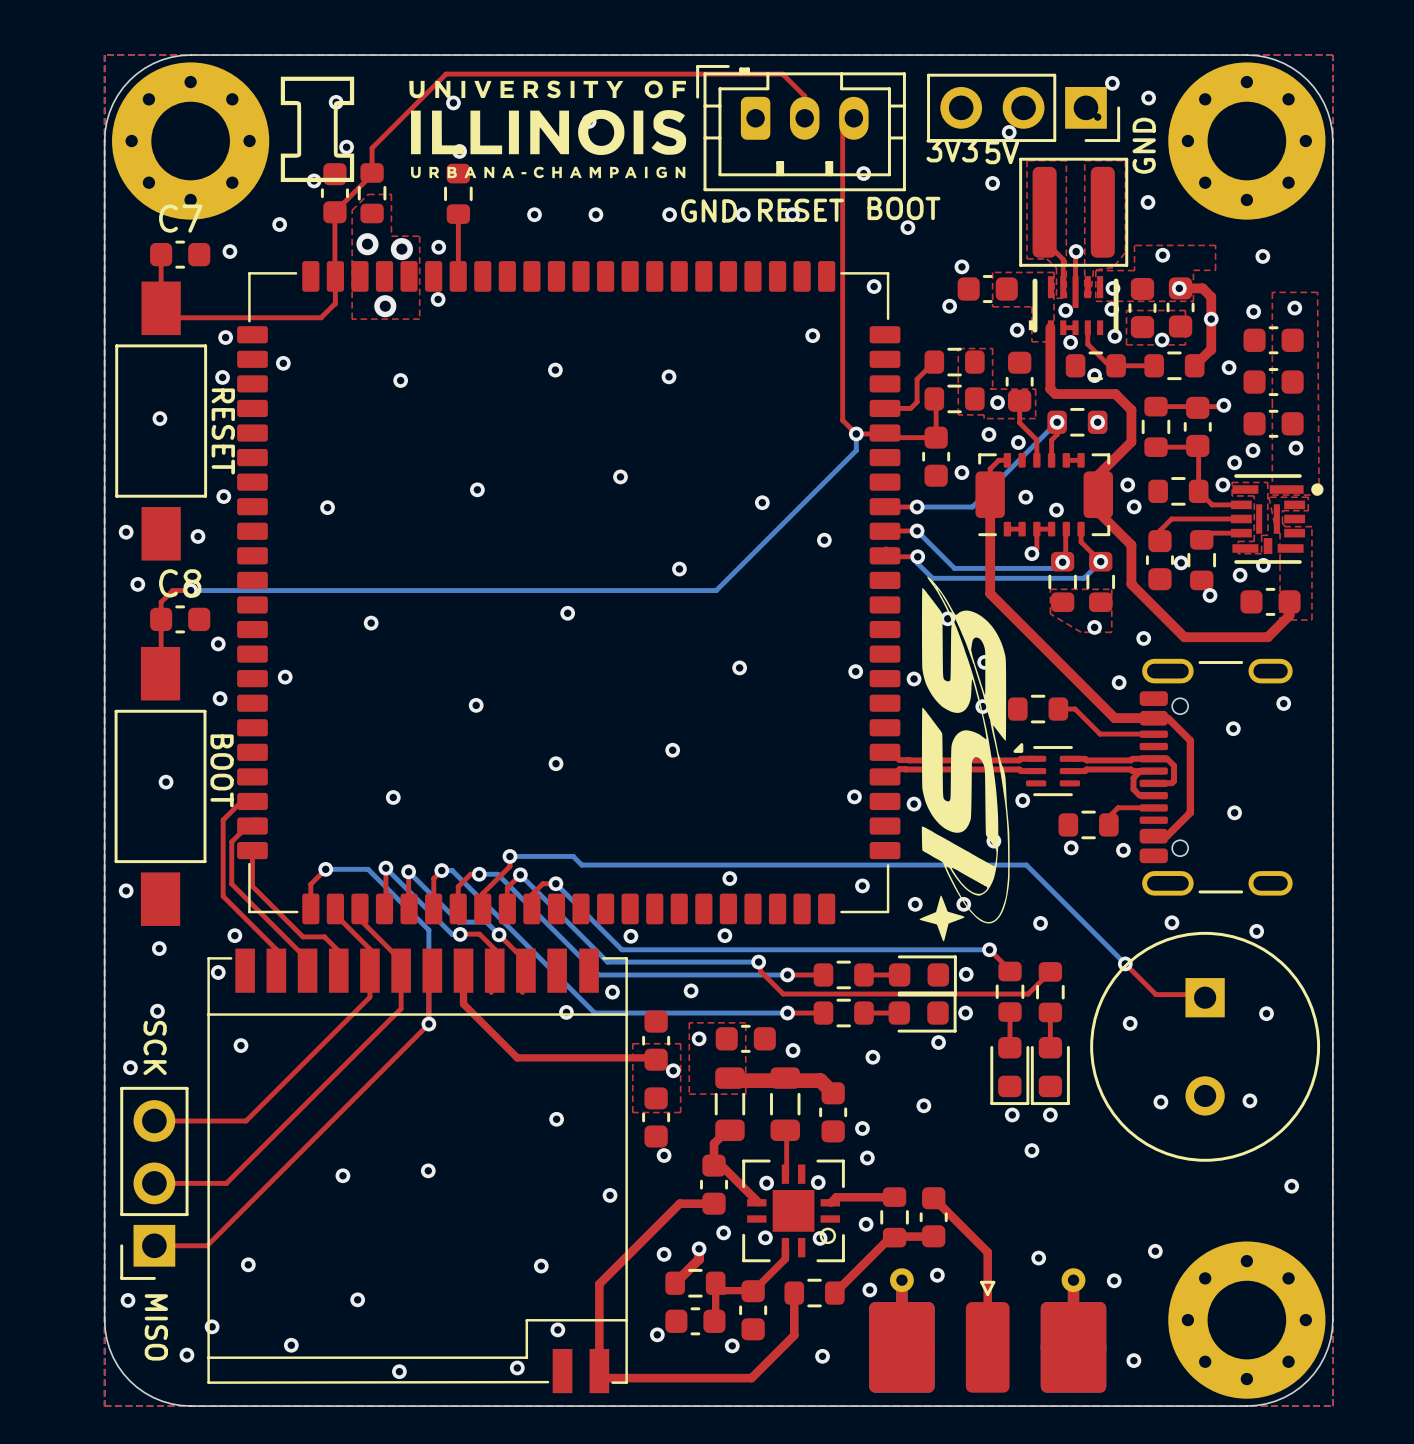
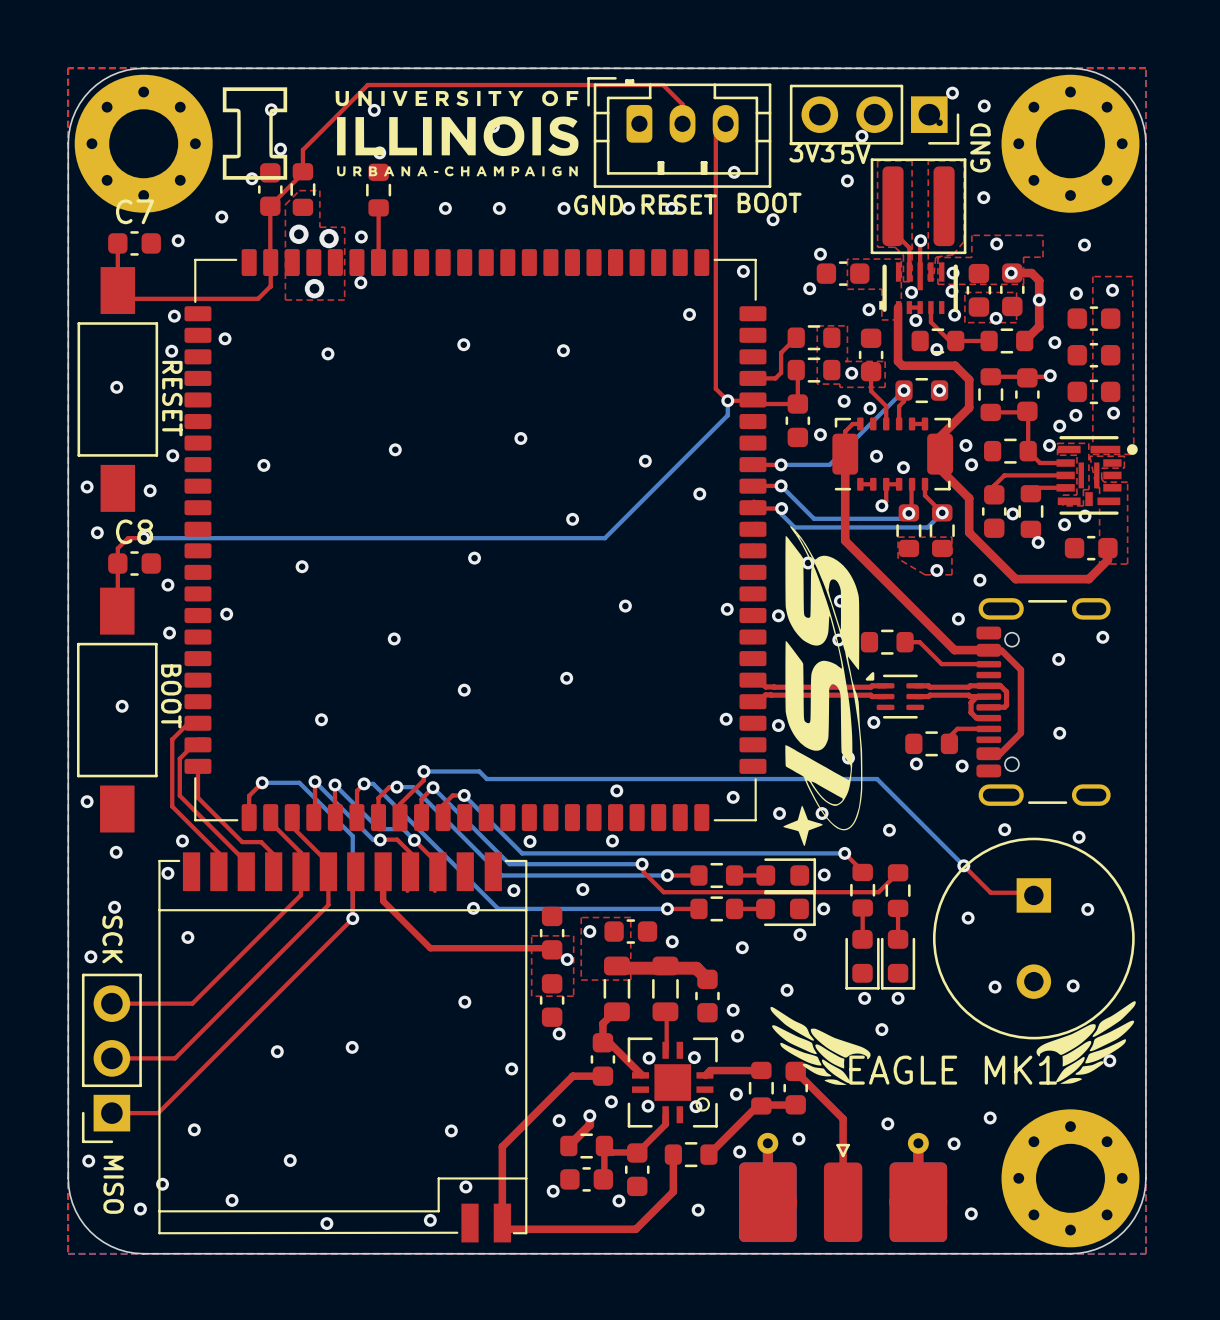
drawing: none -> [1036, 1001, 1136, 1084]
drawing: none -> [770, 1006, 871, 1085]
text: none -> EAGLE MK1 (953, 1070)

